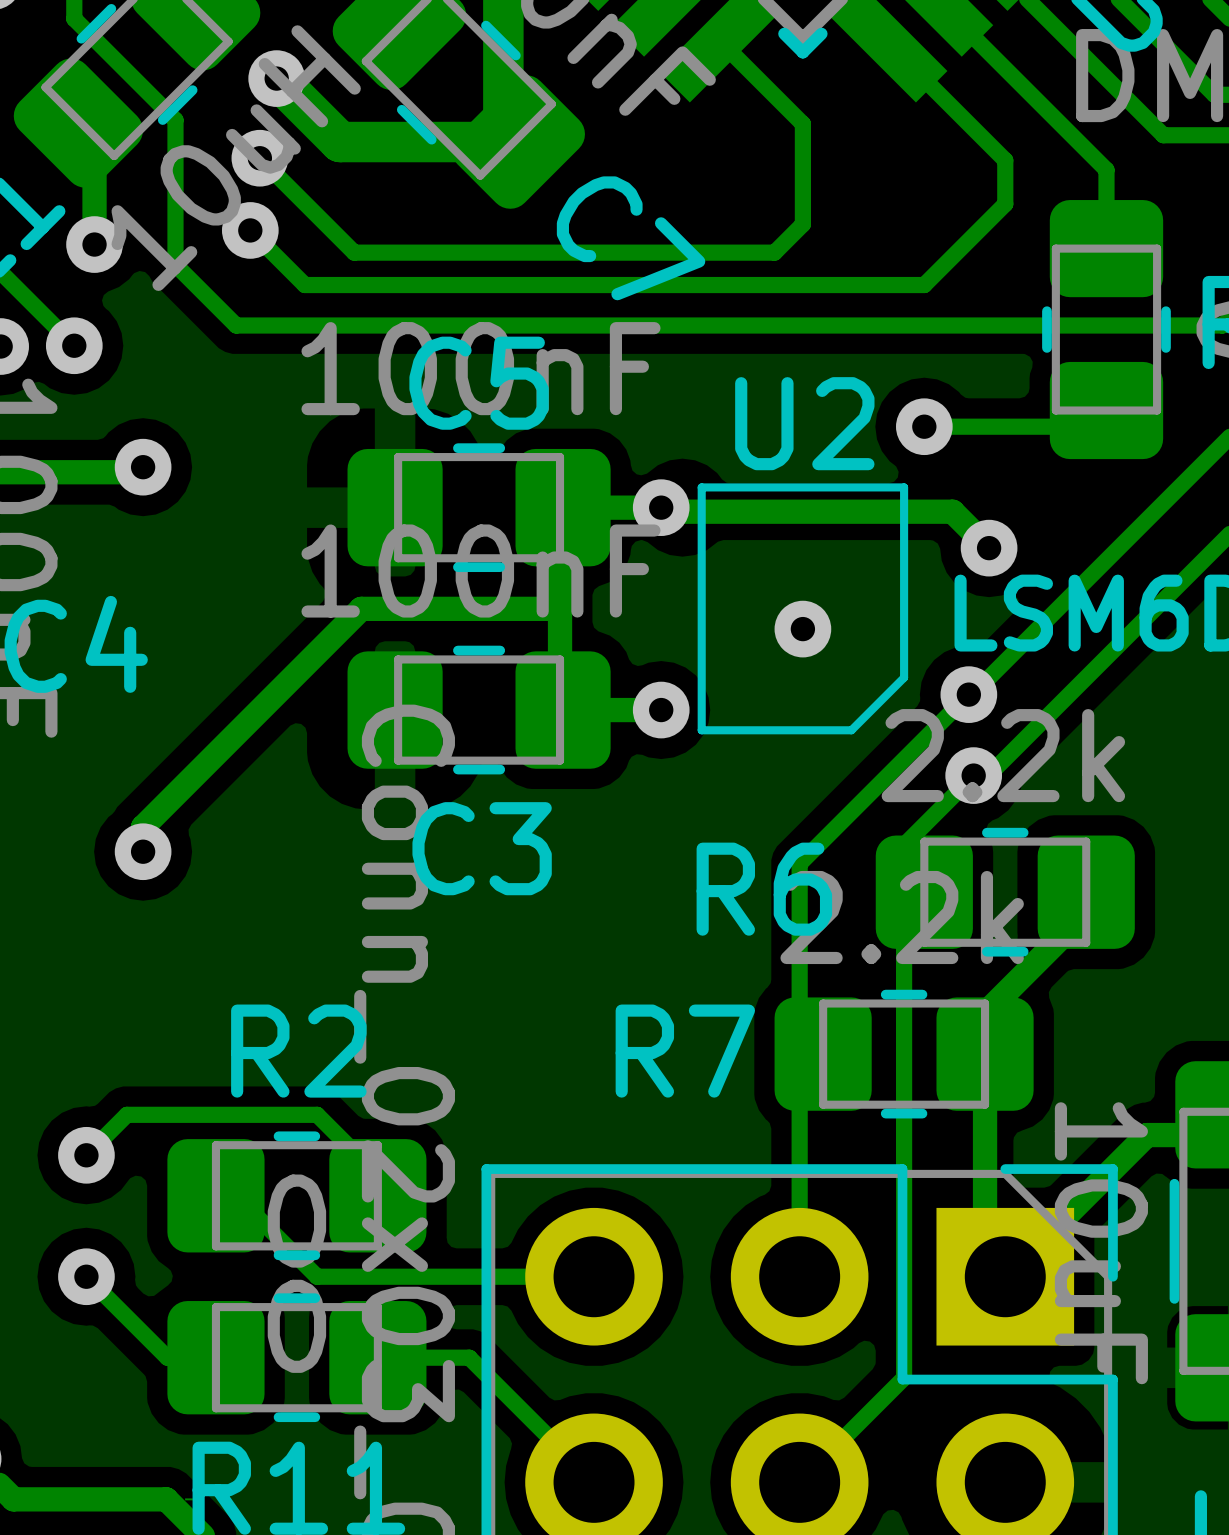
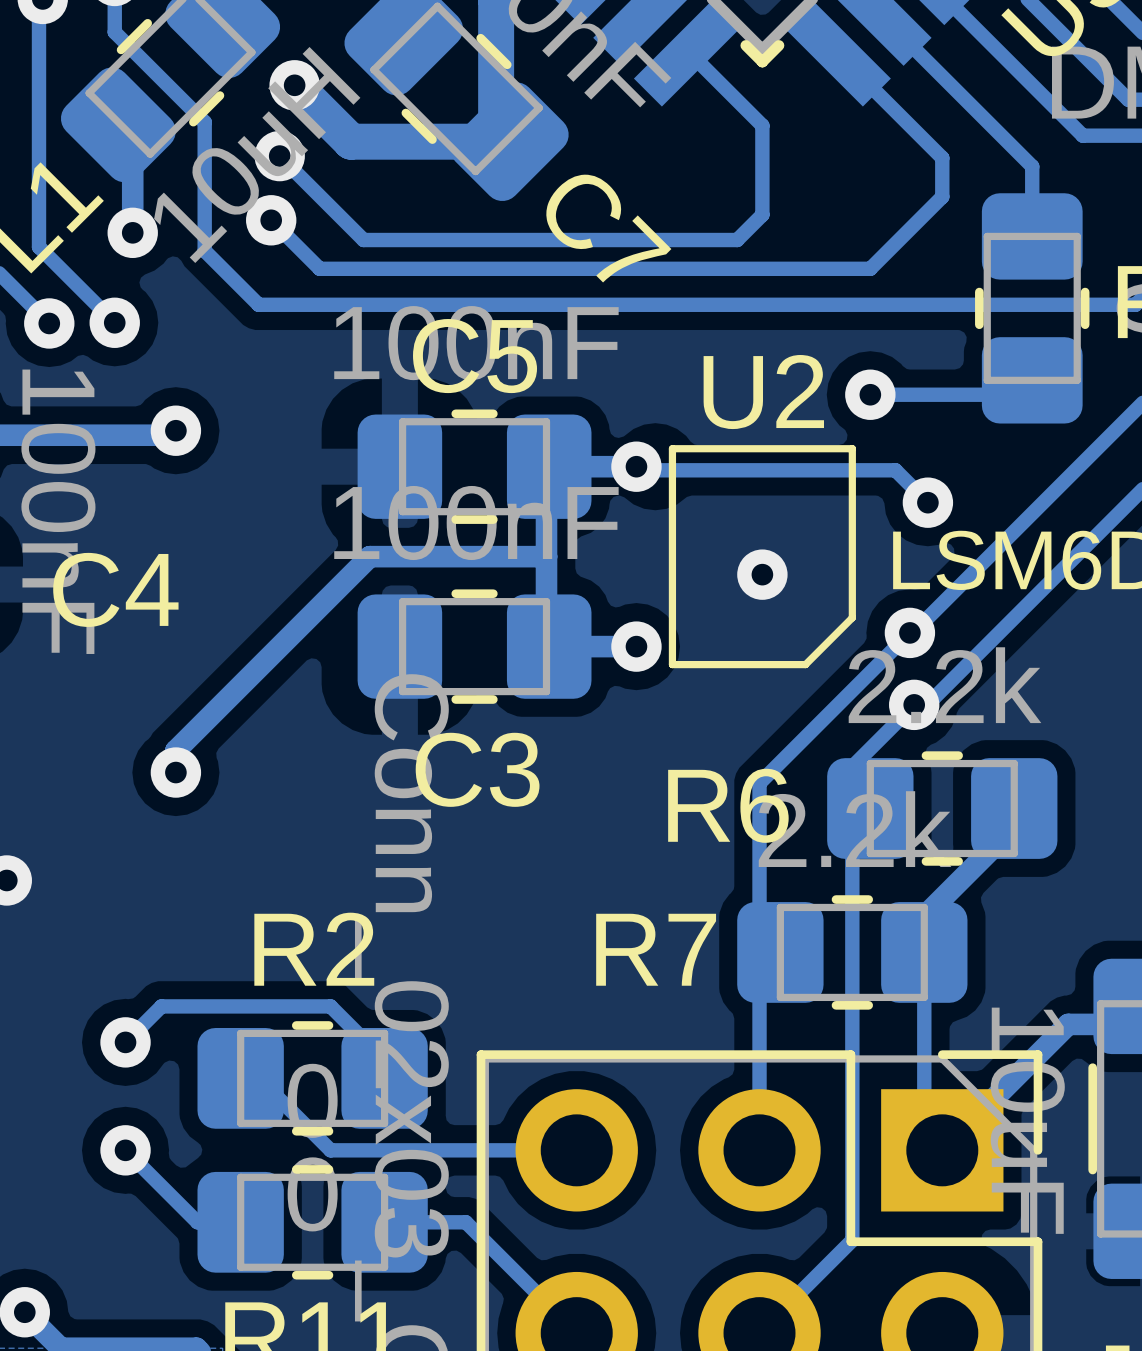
track width: thick (661, 507) (665, 511) (952, 511) (989, 548) -> thin (636, 466) (640, 470) (895, 470) (927, 502)
track width: thick (985, 1054) (985, 1256) -> thin (924, 952) (924, 1132)

